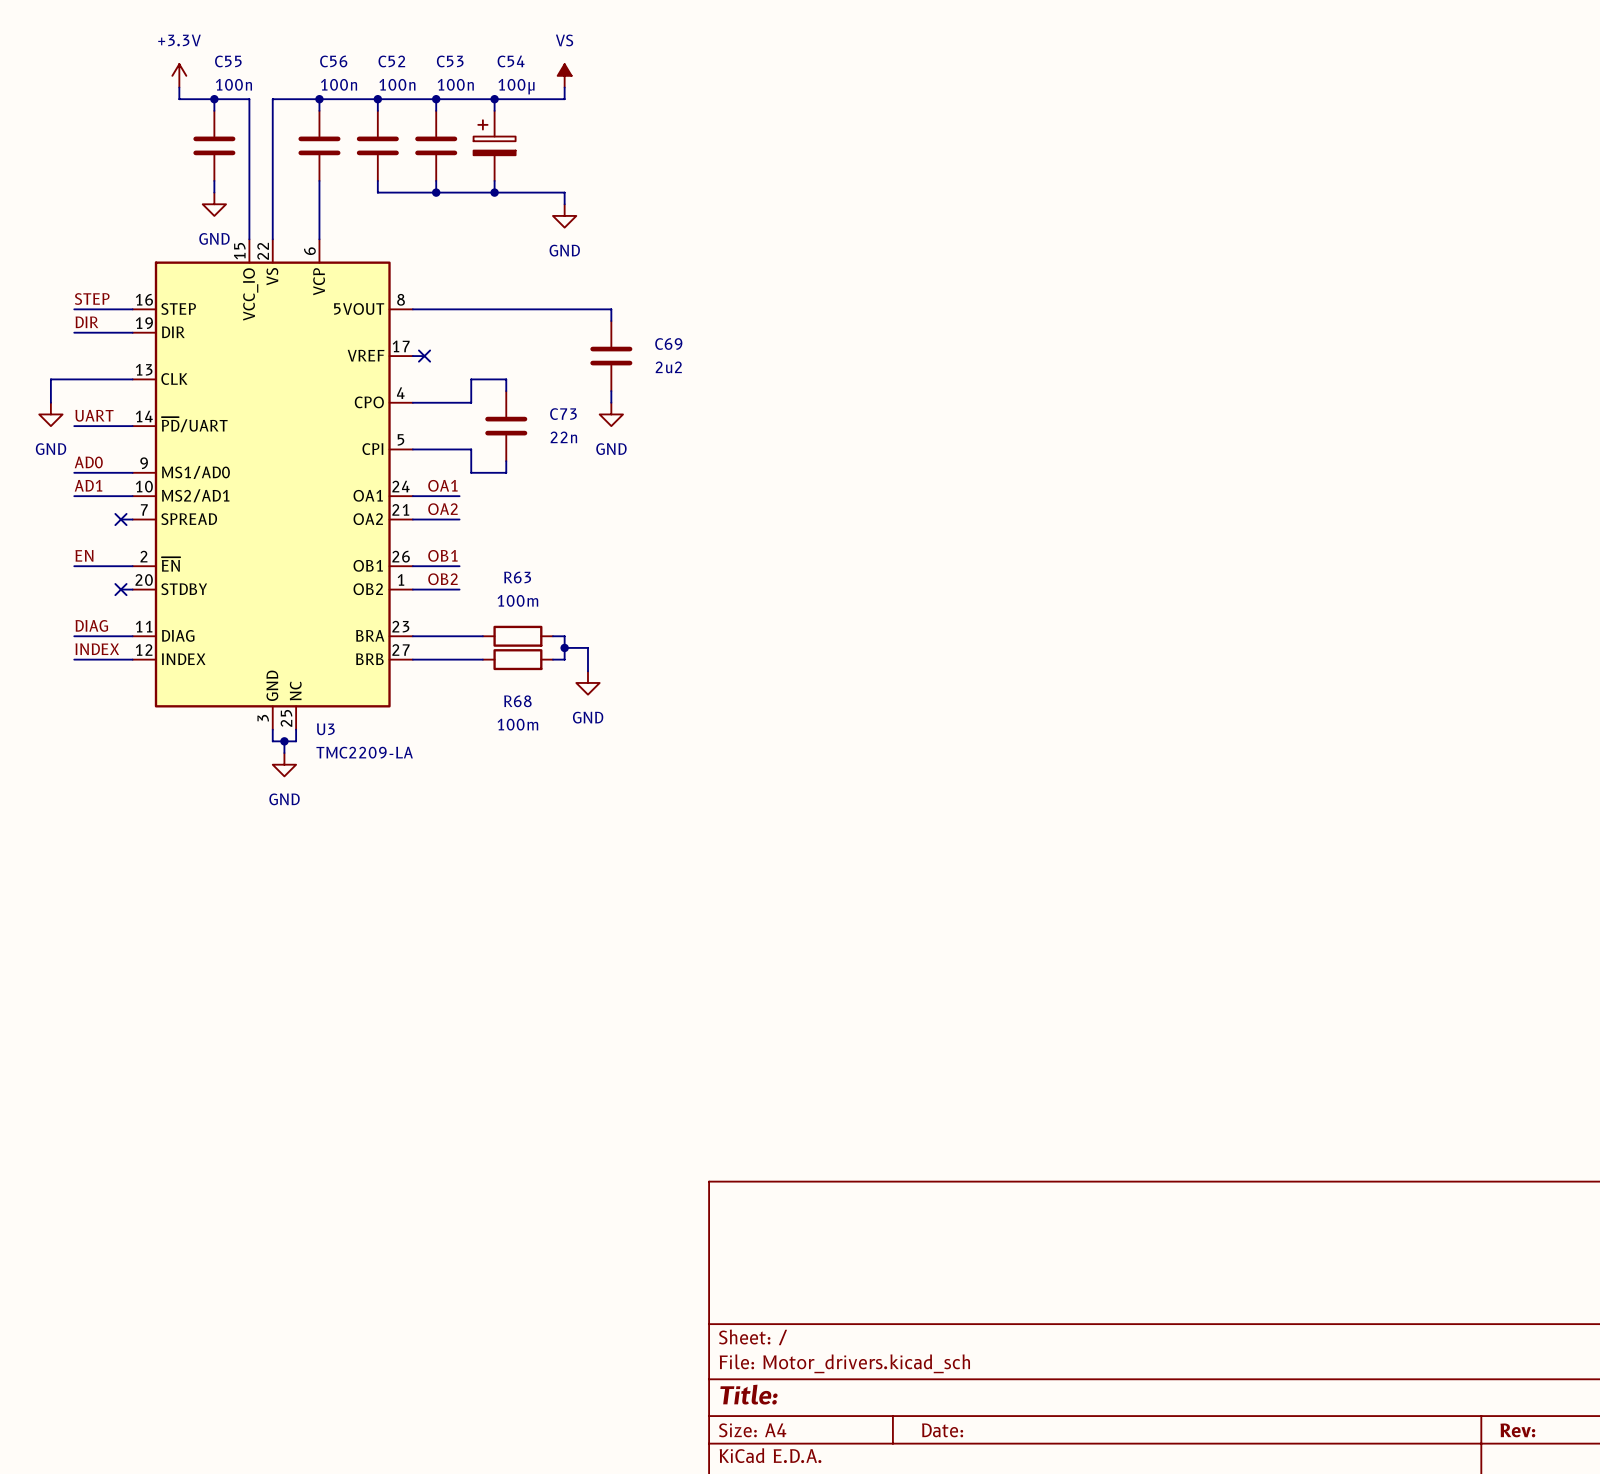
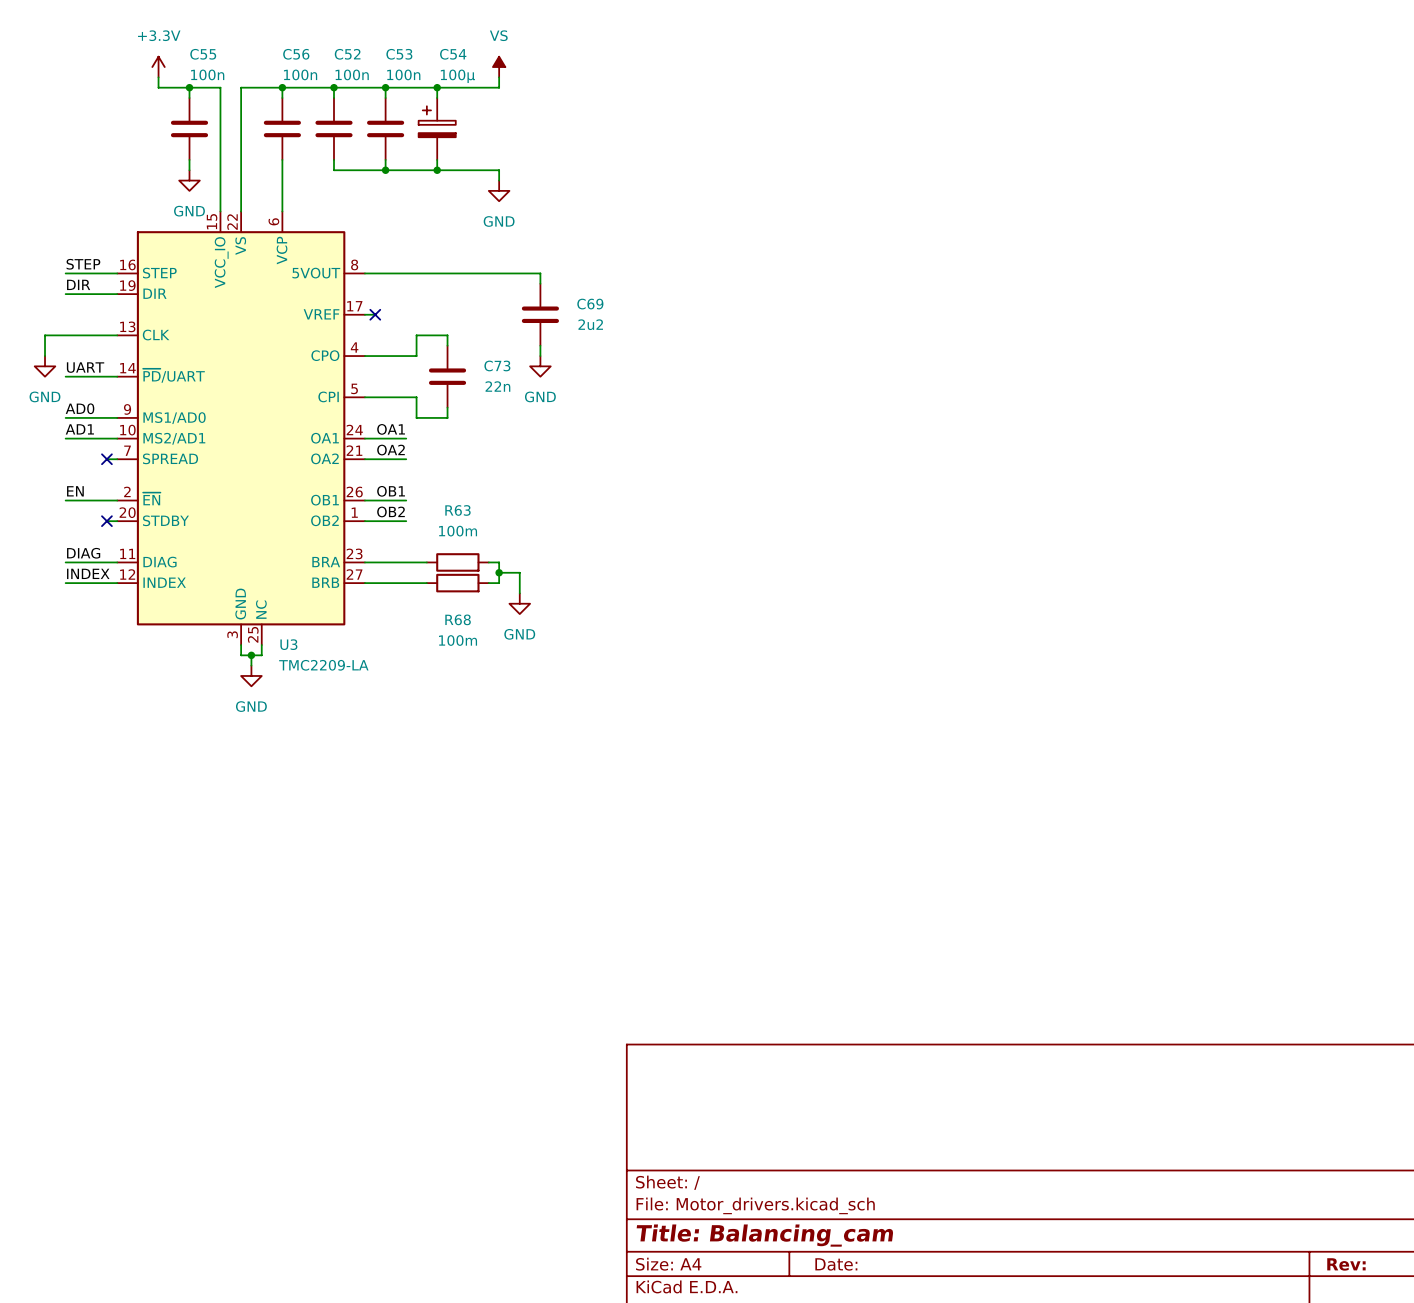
title block: Title: (748, 1394) -> Title: Balancing_cam (764, 1235)

